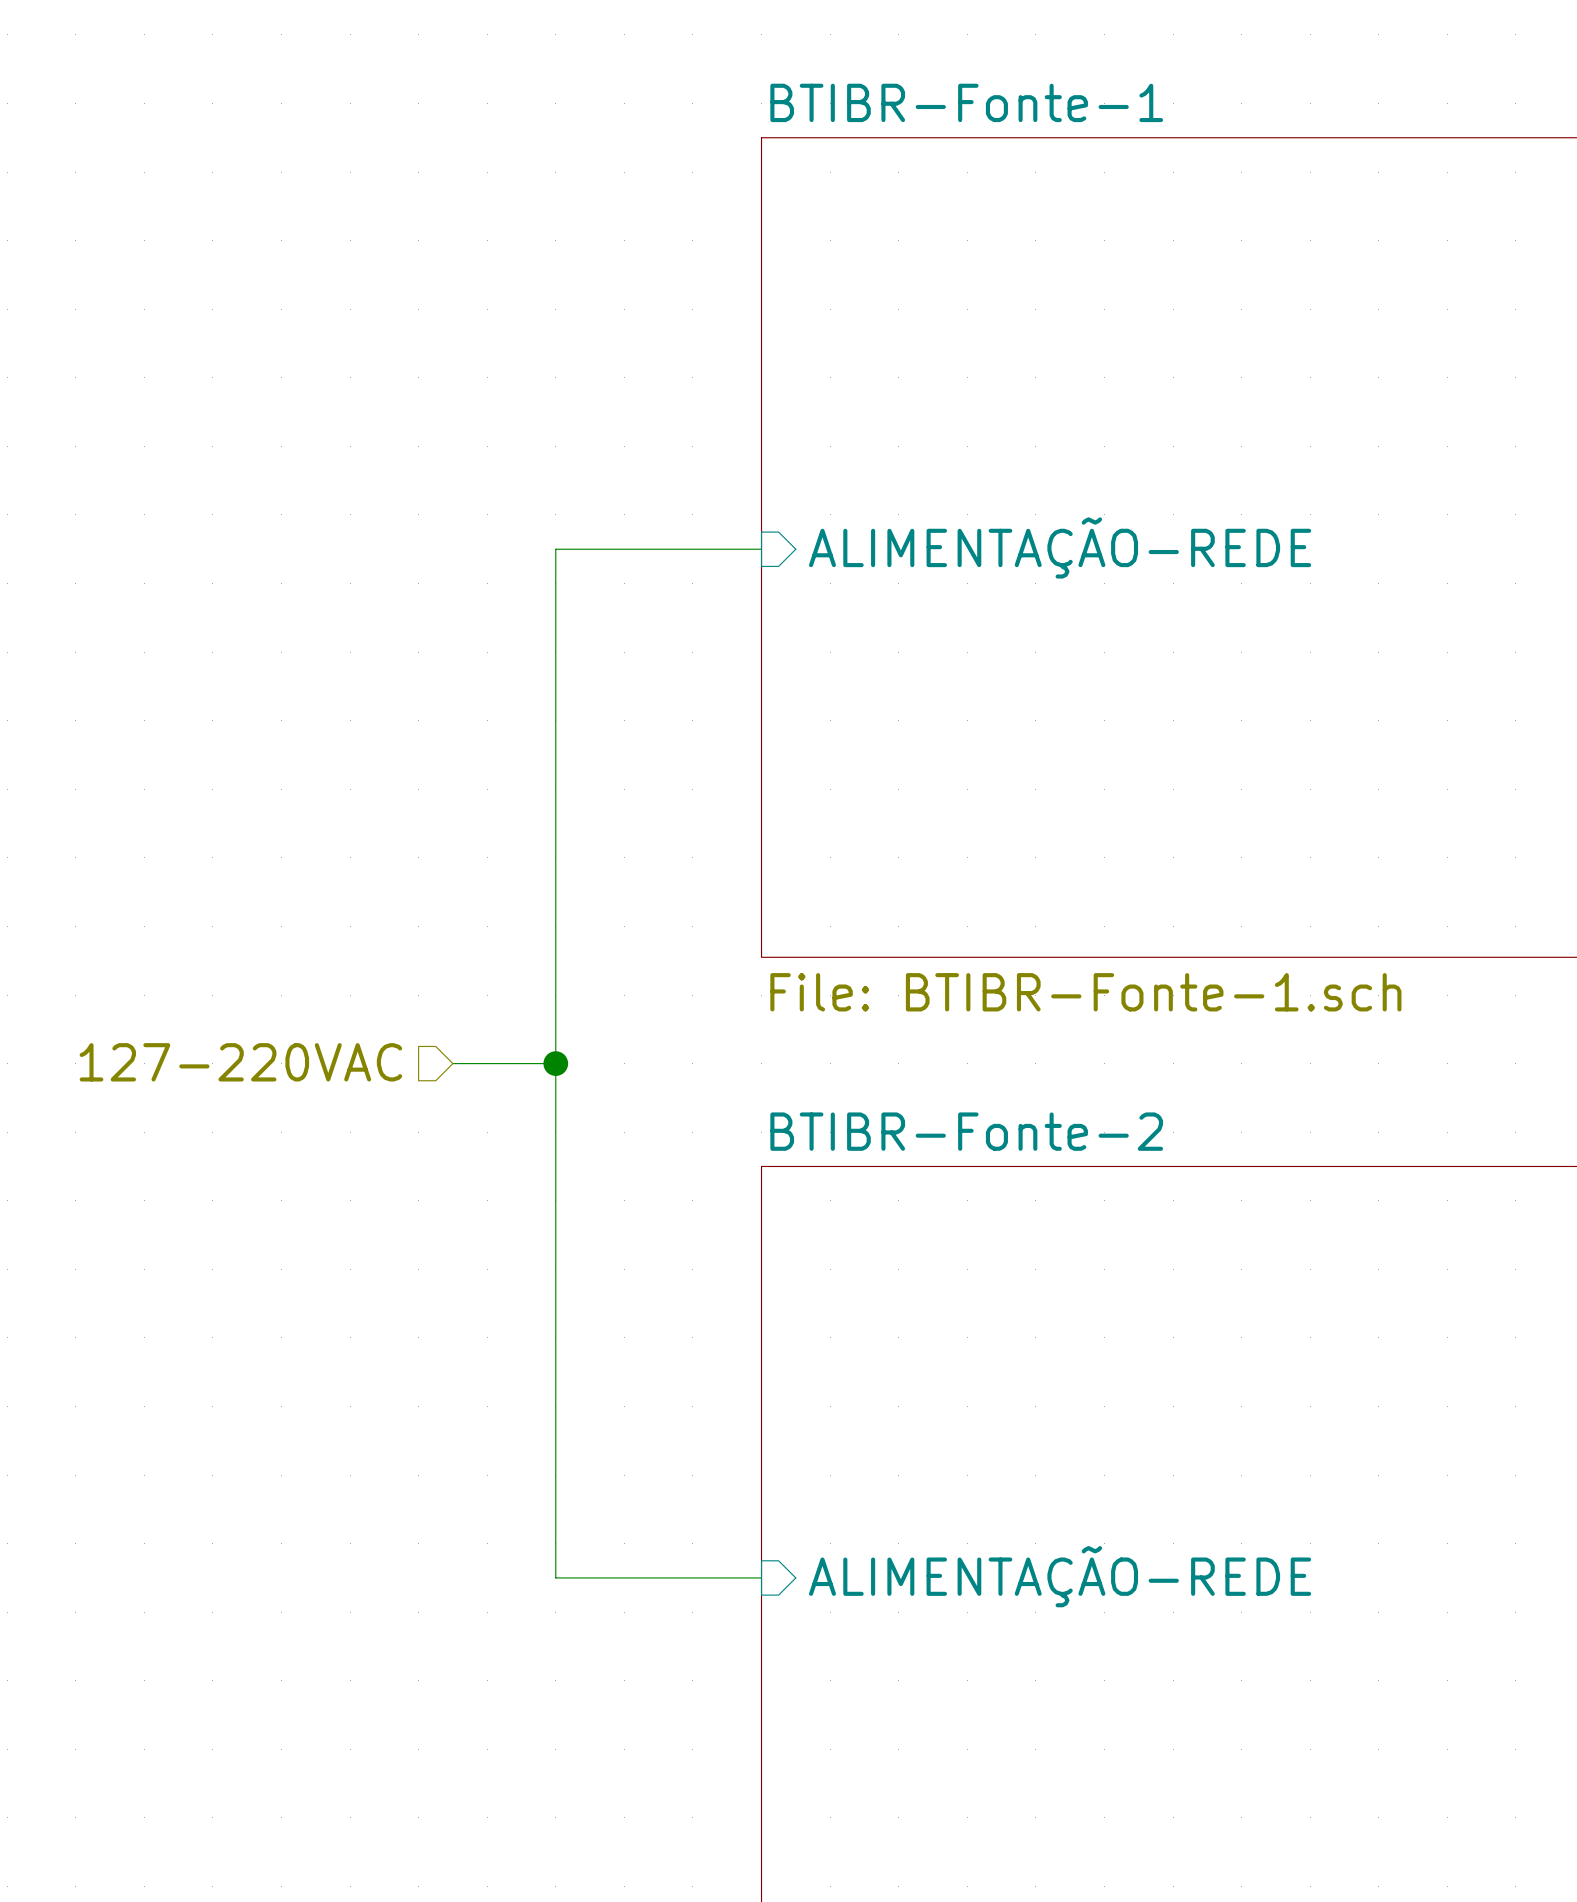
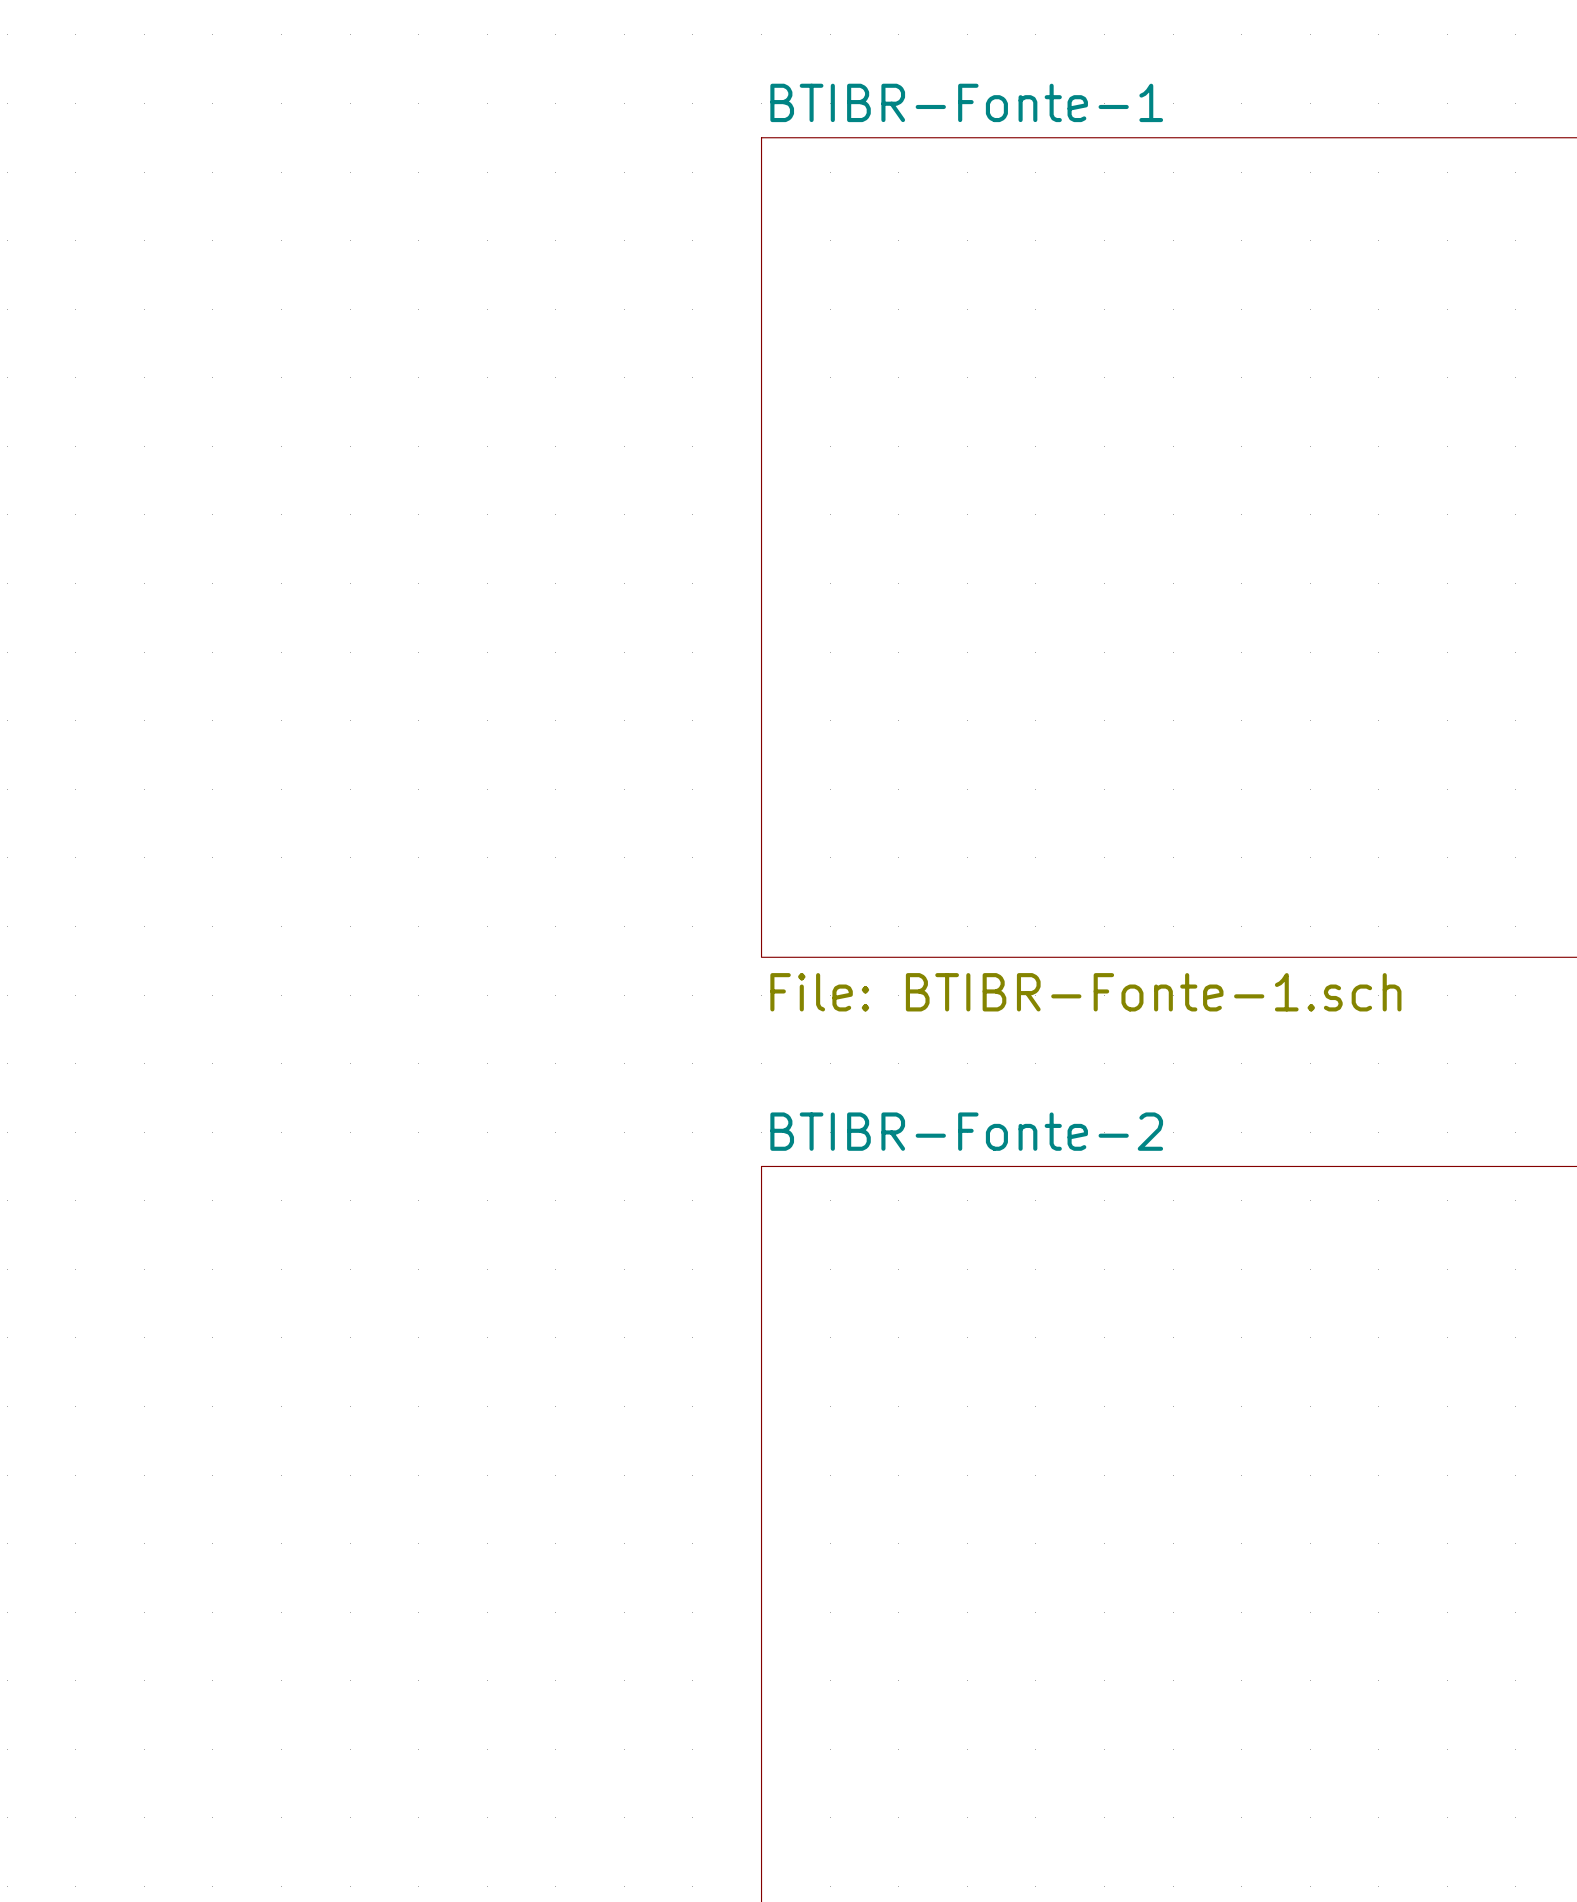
sheet pin: ALIMENTAÇÃO-REDE (1060, 547) -> none
wire: (761, 549) (555, 549) (555, 1577) (761, 1577) -> none
hierarchical label: 127-220VAC (240, 1062) -> none
wire: (452, 1063) (555, 1063) -> none
junction: (555, 1063) -> none
sheet pin: ALIMENTAÇÃO-REDE (1060, 1576) -> none

